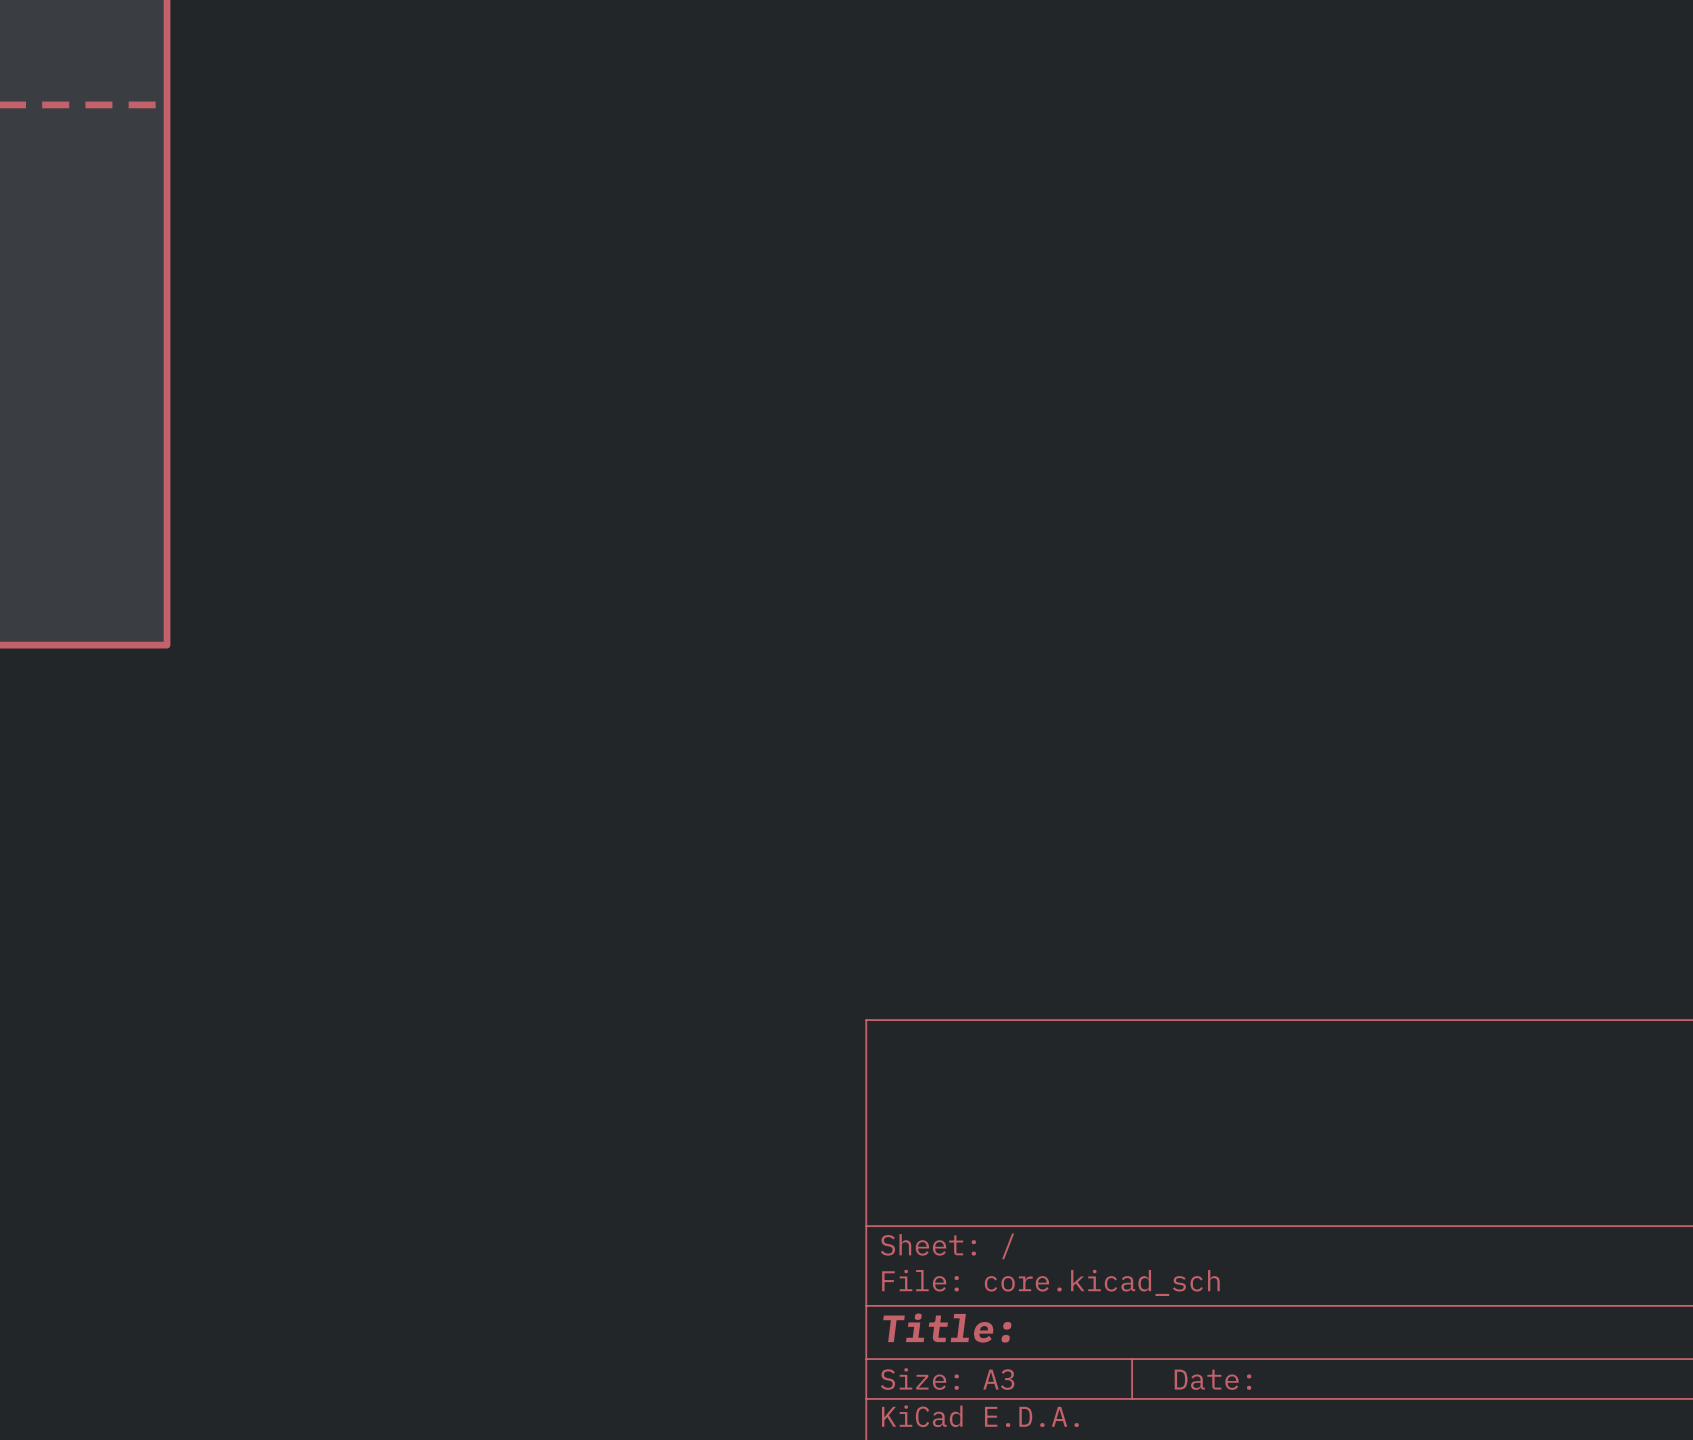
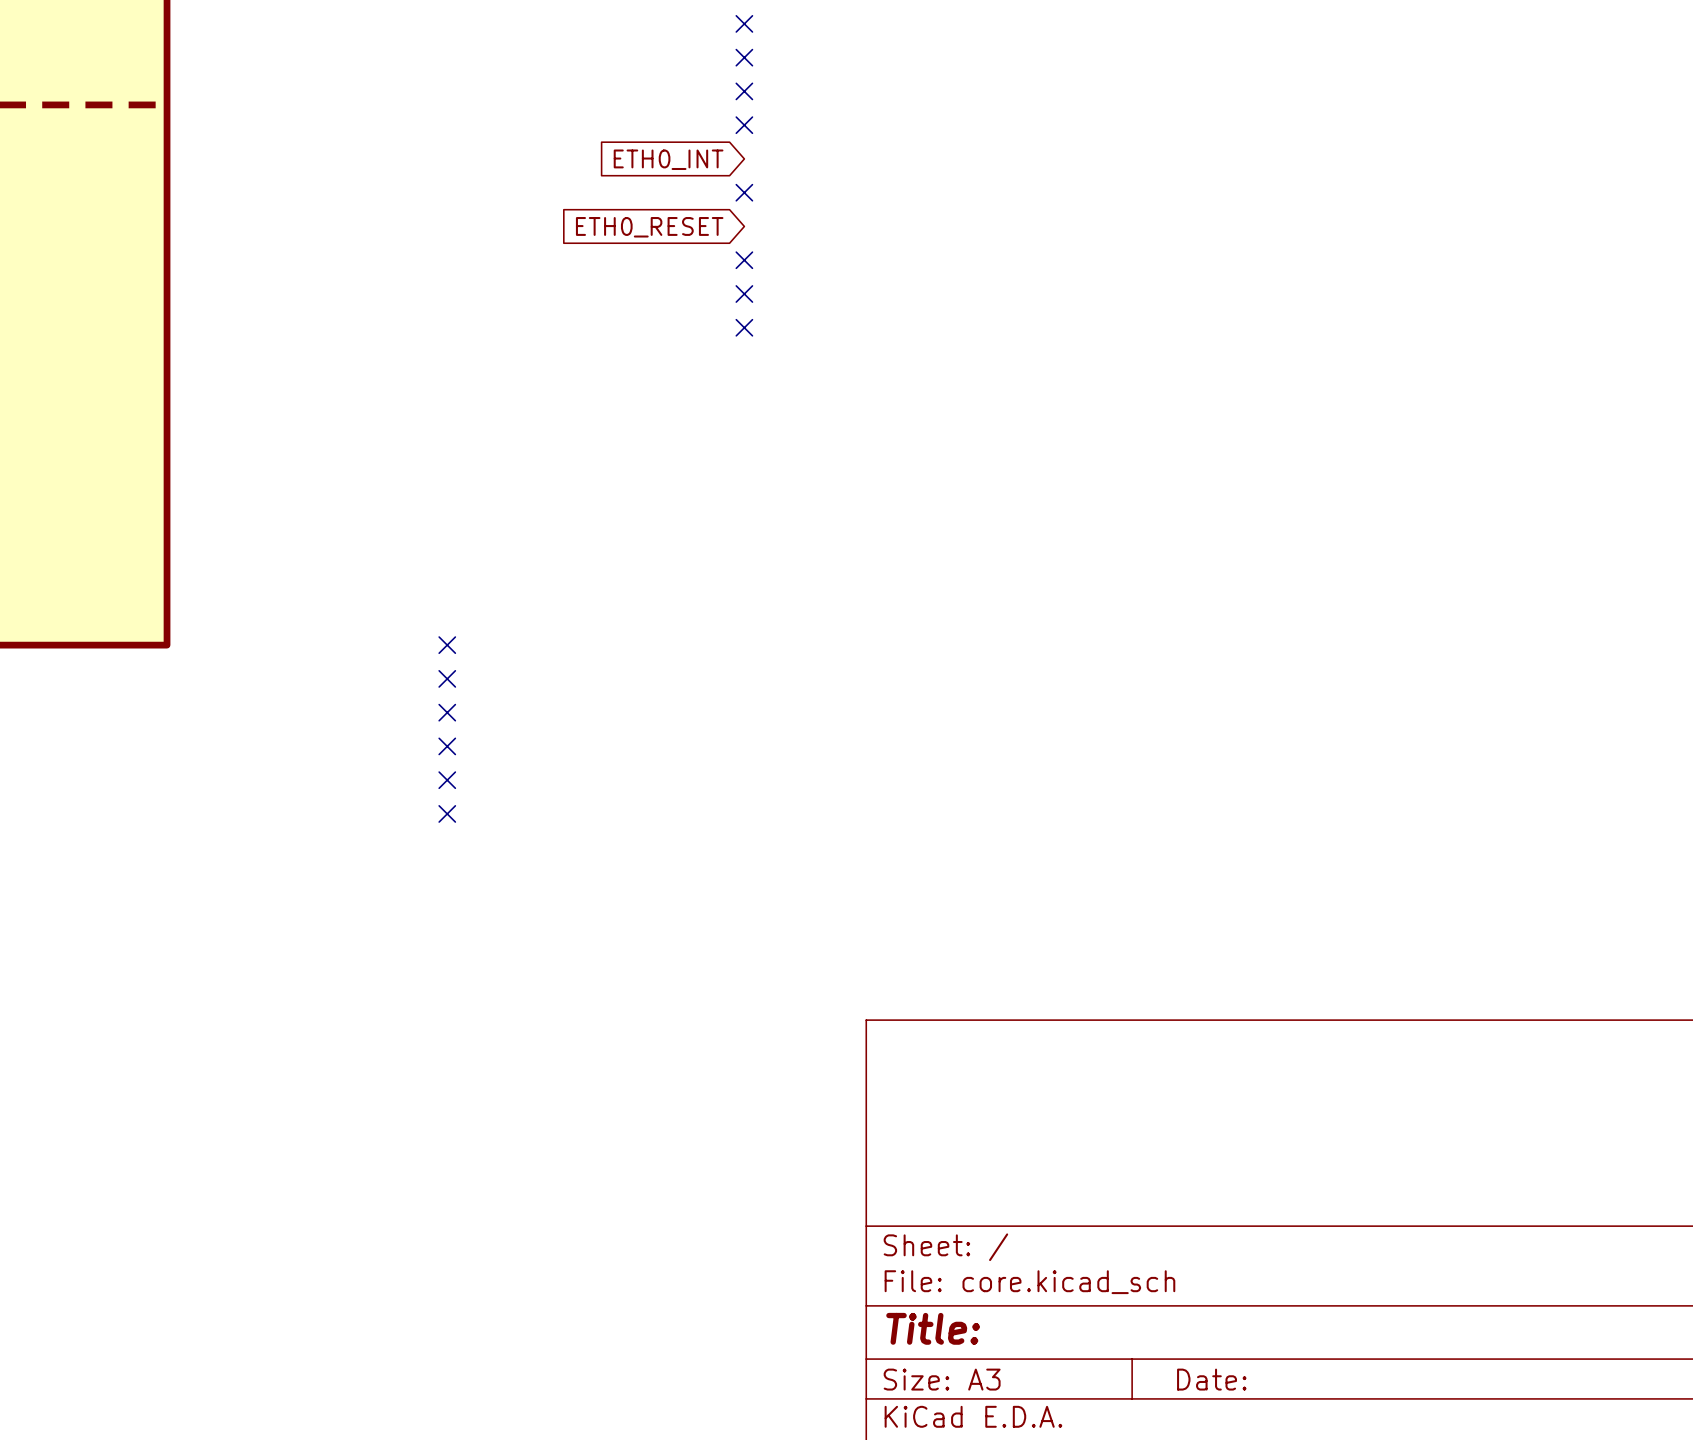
no-connect mark: none -> (744, 23)
no-connect mark: none -> (744, 57)
no-connect mark: none -> (744, 91)
no-connect mark: none -> (744, 125)
global label: none -> ETH0_INT (668, 159)
no-connect mark: none -> (744, 192)
global label: none -> ETH0_RESET (649, 227)
no-connect mark: none -> (744, 260)
no-connect mark: none -> (744, 293)
no-connect mark: none -> (744, 327)
no-connect mark: none -> (447, 645)
no-connect mark: none -> (447, 678)
no-connect mark: none -> (447, 712)
no-connect mark: none -> (447, 746)
no-connect mark: none -> (447, 780)
no-connect mark: none -> (447, 813)

